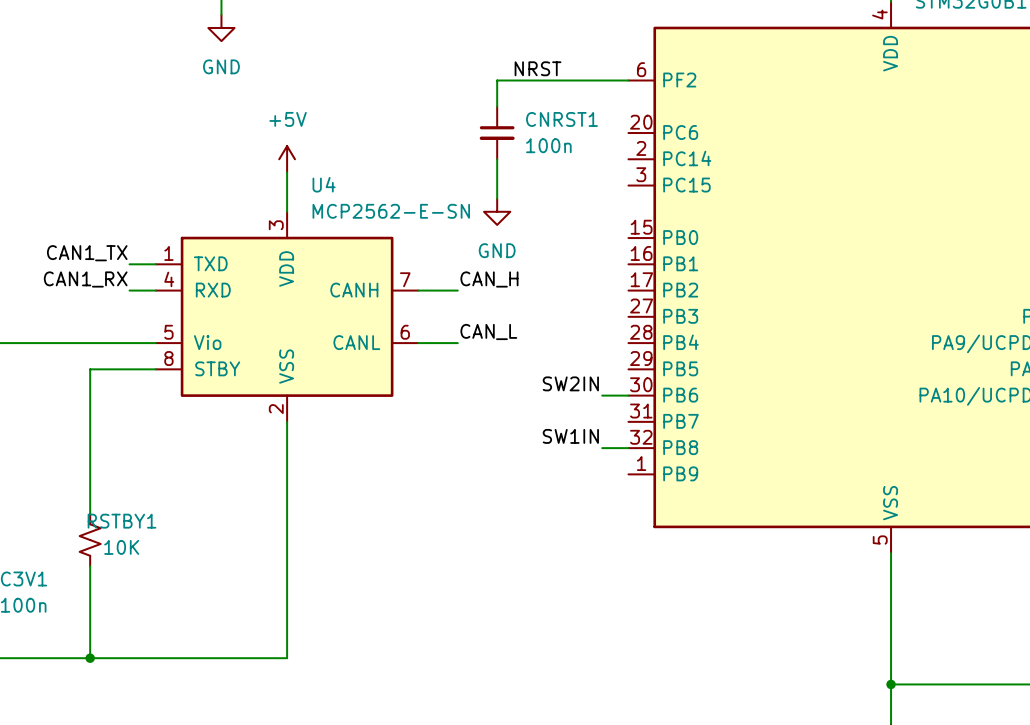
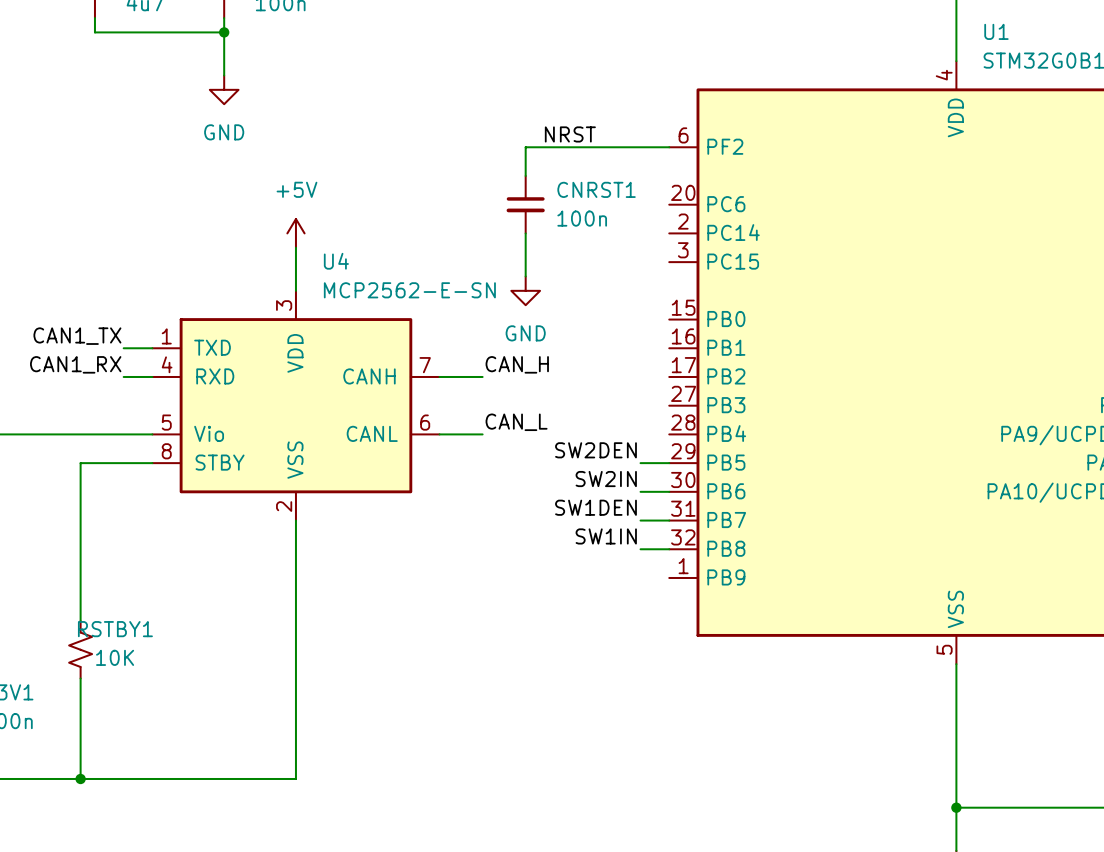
label: none -> SW2DEN (595, 450)
wire: none -> (640, 463) (669, 463)
label: none -> SW1DEN (595, 507)
wire: none -> (640, 520) (669, 520)

